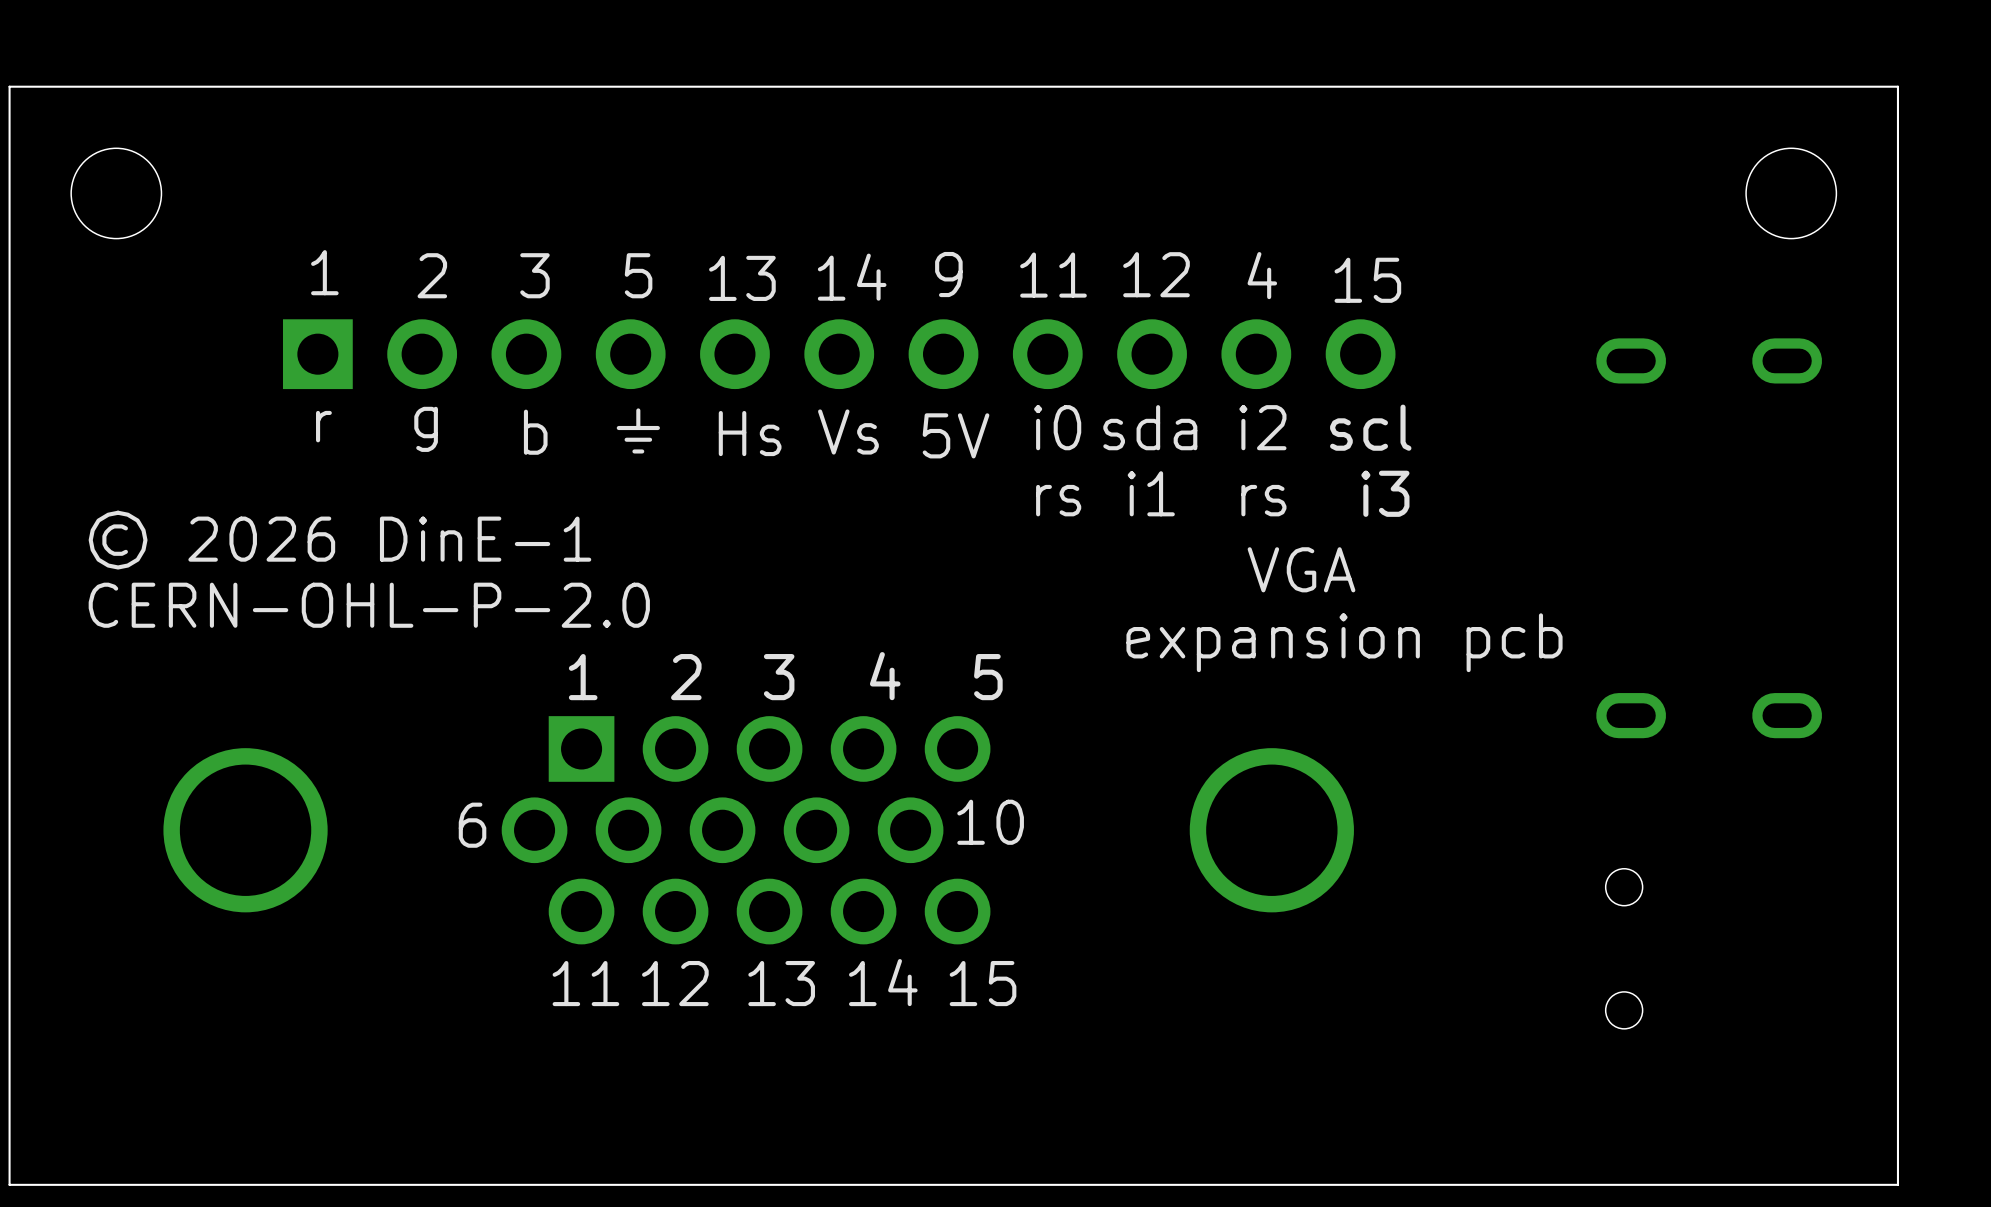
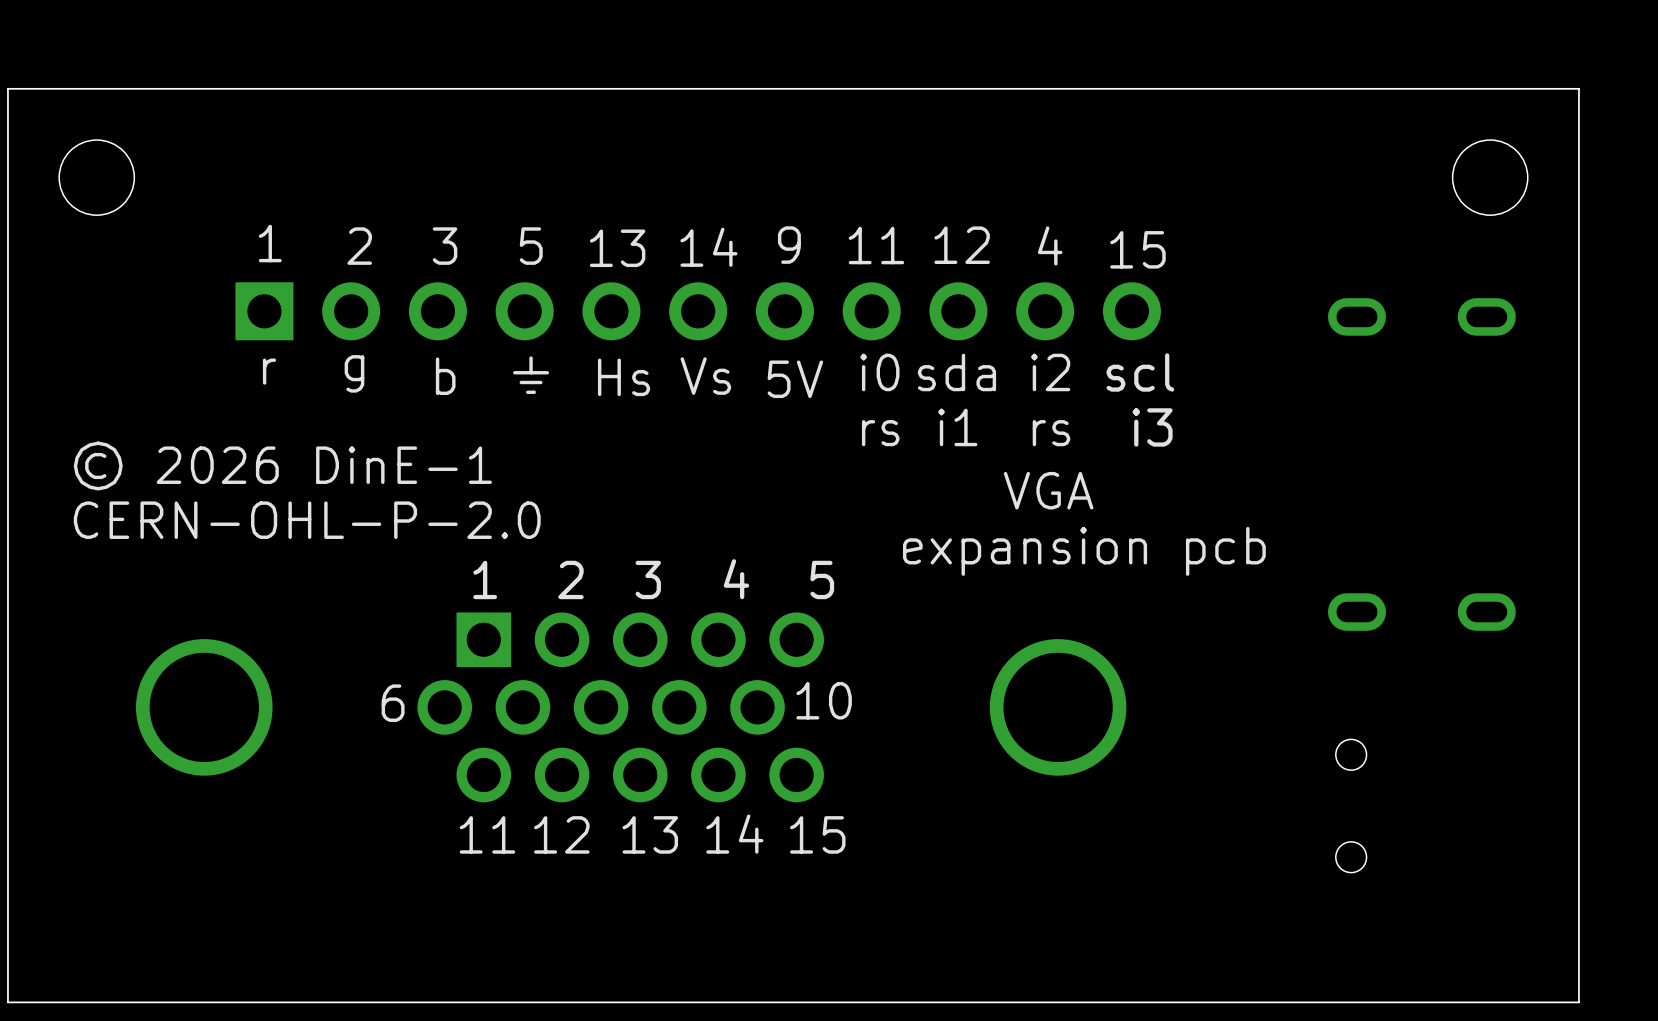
text position: VGA (1301, 569) -> VGA (1048, 490)
text position: expansion pcb (1344, 642) -> expansion pcb (1084, 551)

